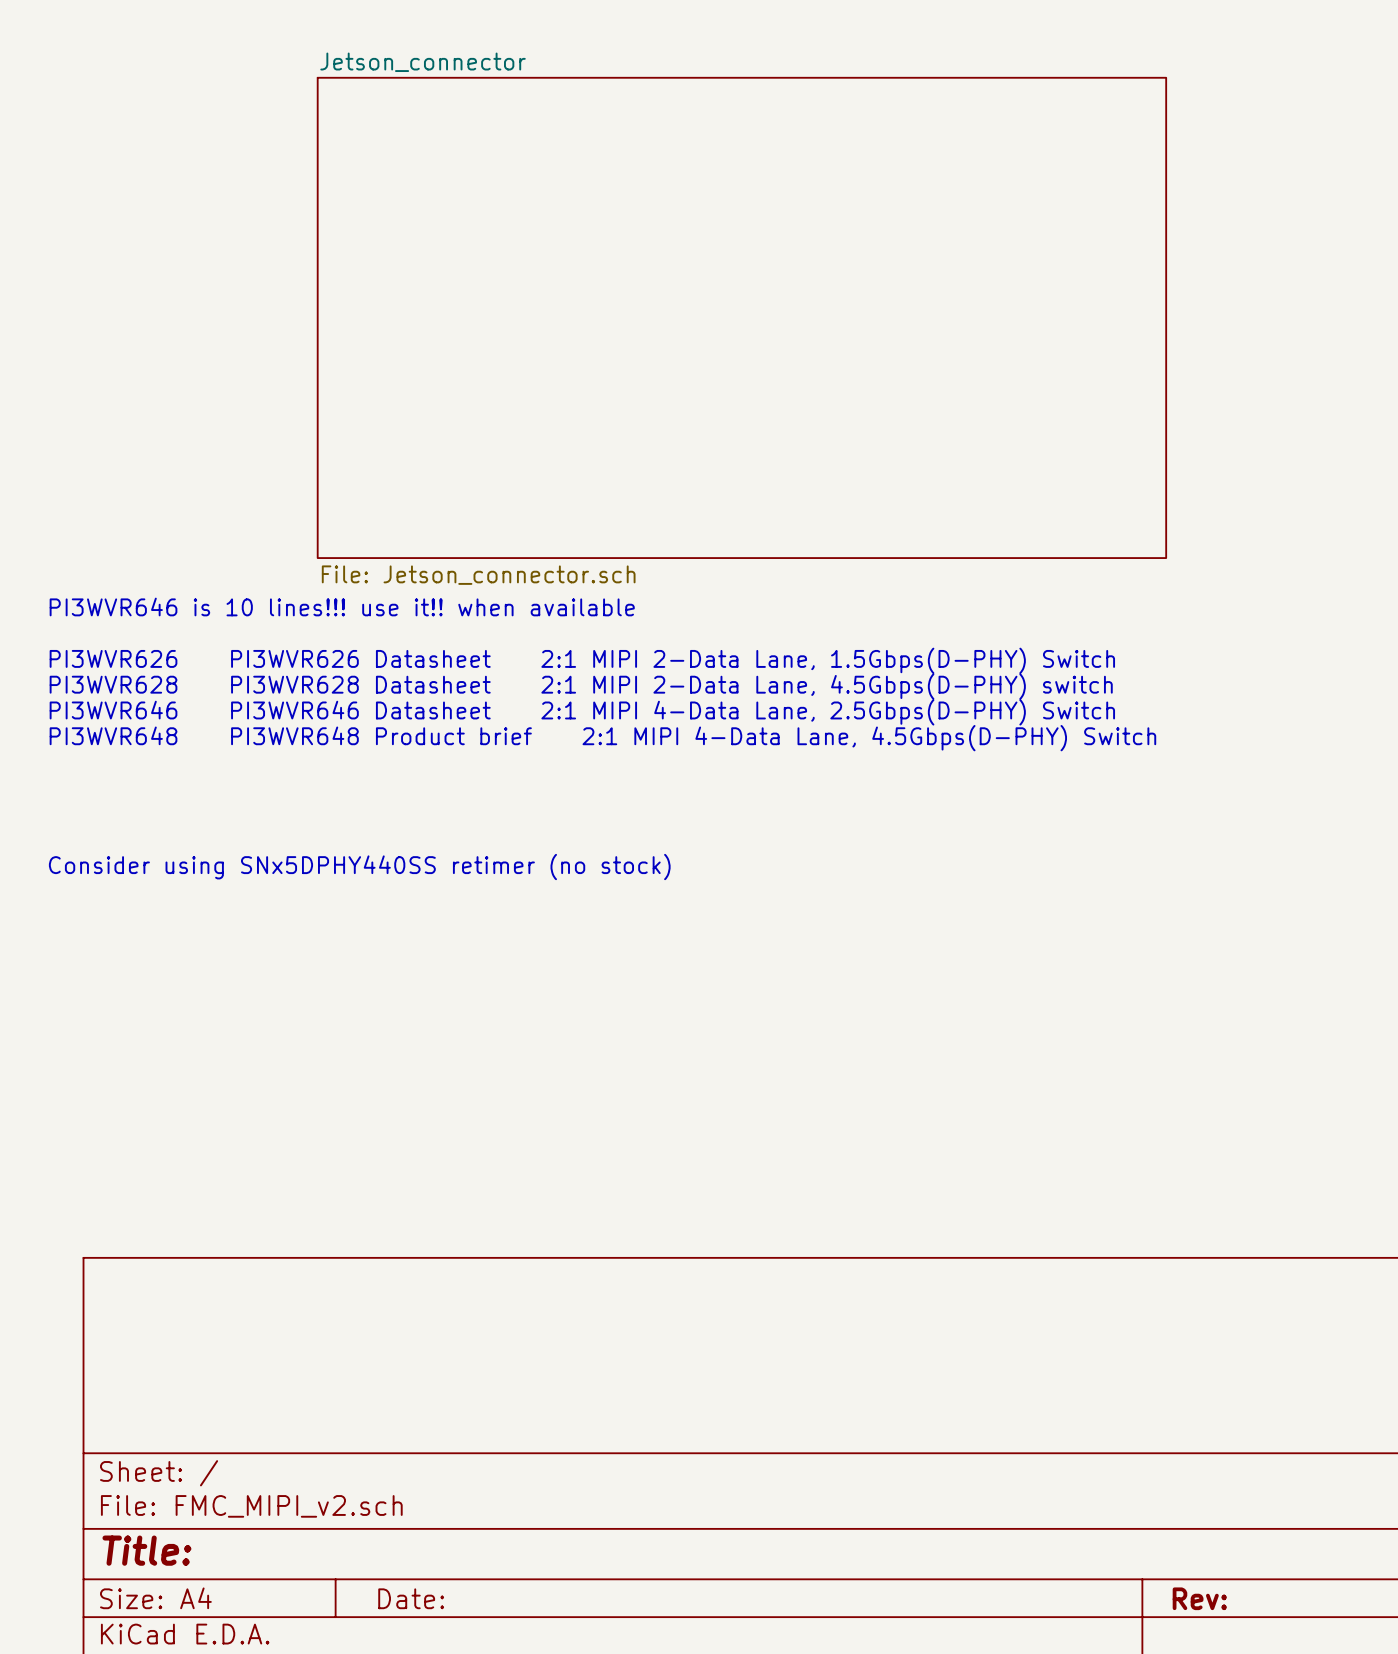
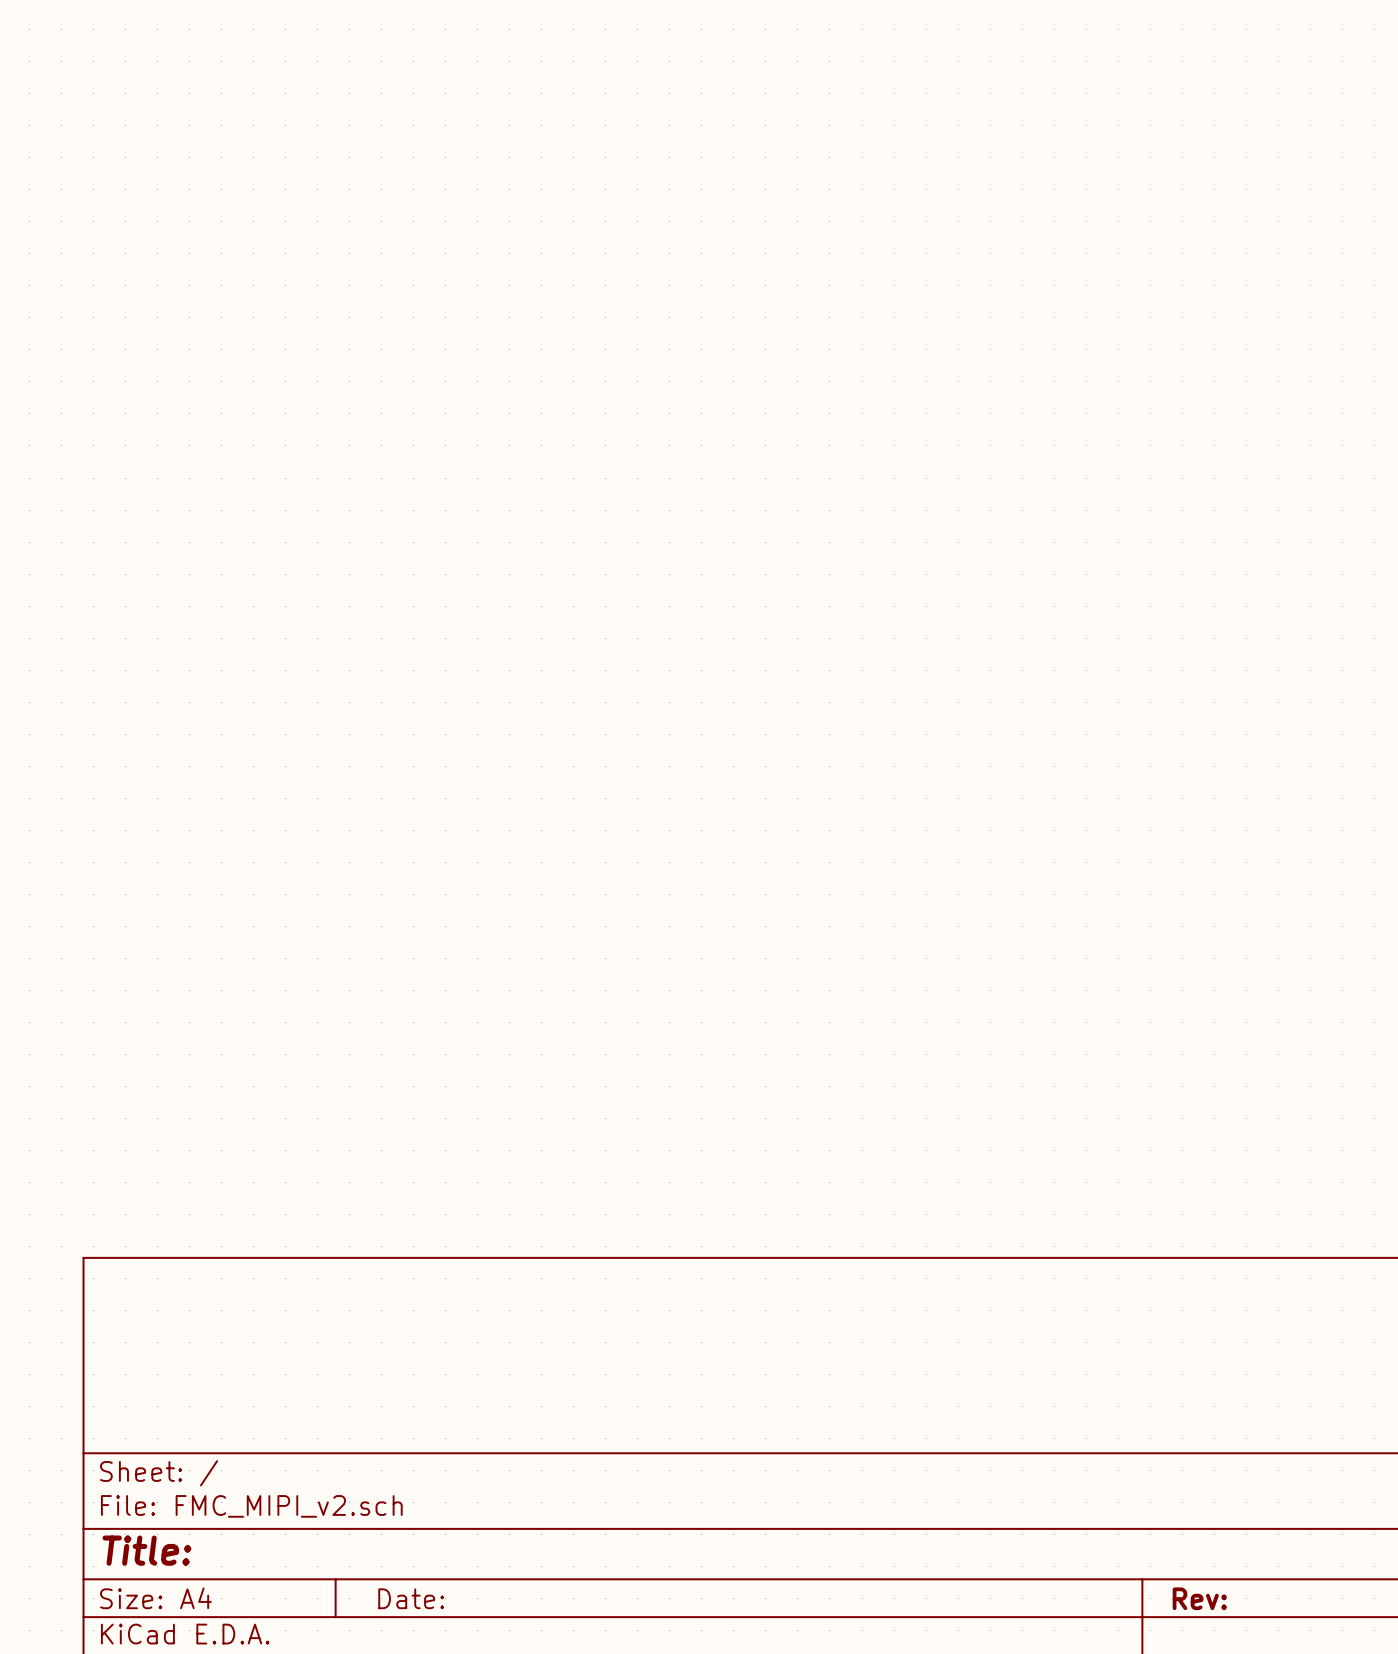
sheet Jetson_connector: File: Jetson_connector.sch (741, 317) -> none
text: PI3WVR646 is 10 lines!!! use it!! when available (342, 606) -> none
text: PI3WVR626 PI3WVR626 Datasheet 2:1 MIPI 2-Data Lane, 1.5Gbps(D-PHY) Switch (582, 660) -> none
text: PI3WVR628 PI3WVR628 Datasheet 2:1 MIPI 2-Data Lane, 4.5Gbps(D-PHY) switch (581, 686) -> none
text: PI3WVR646 PI3WVR646 Datasheet 2:1 MIPI 4-Data Lane, 2.5Gbps(D-PHY) Switch (582, 712) -> none
text: PI3WVR648 PI3WVR648 Product brief 2:1 MIPI 4-Data Lane, 4.5Gbps(D-PHY) Switch (602, 738) -> none
text: Consider using SNx5DPHY440SS retimer (no stock) (359, 867) -> none

